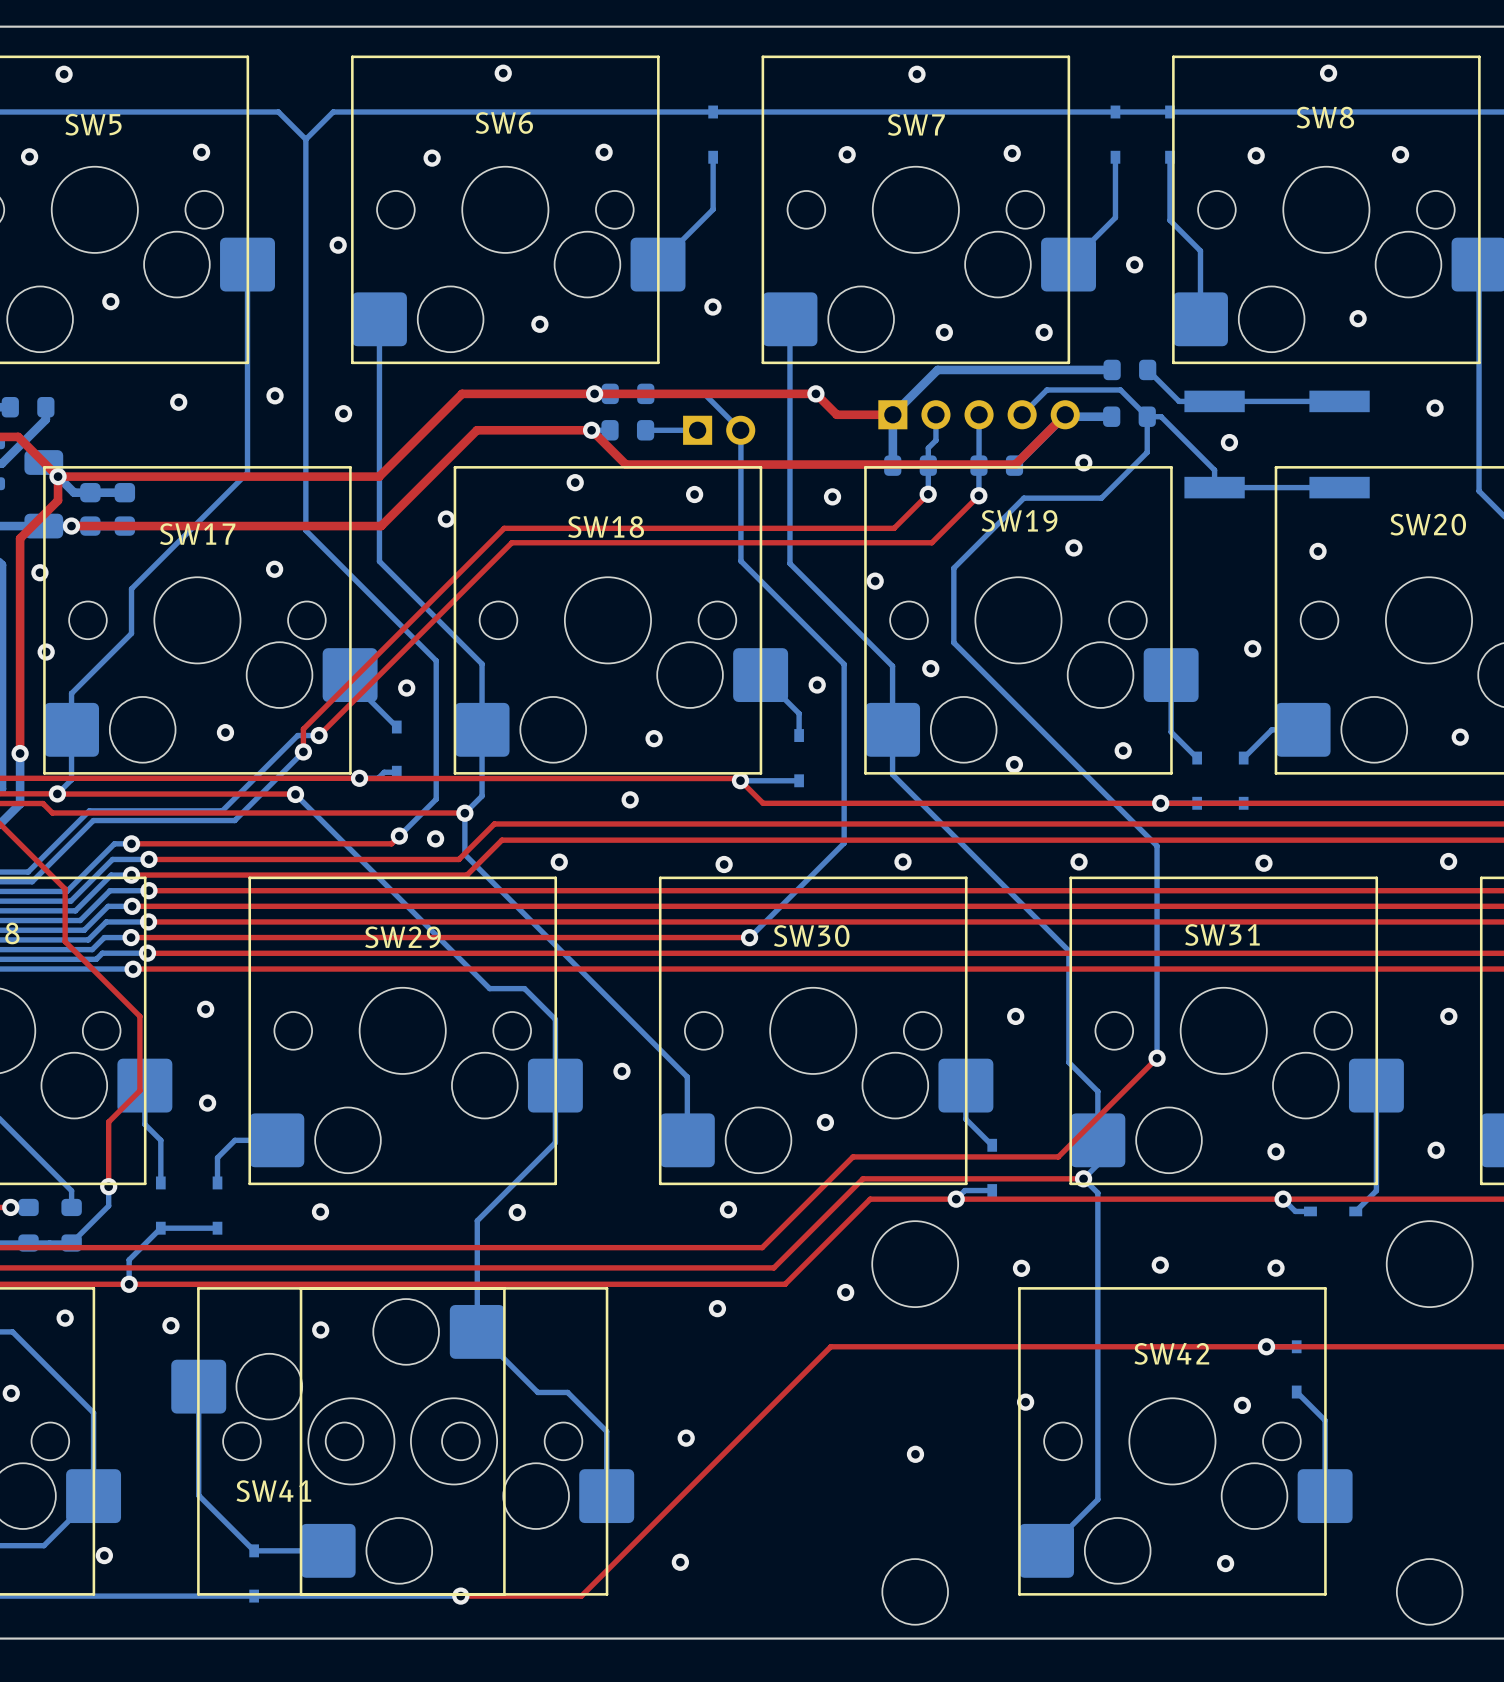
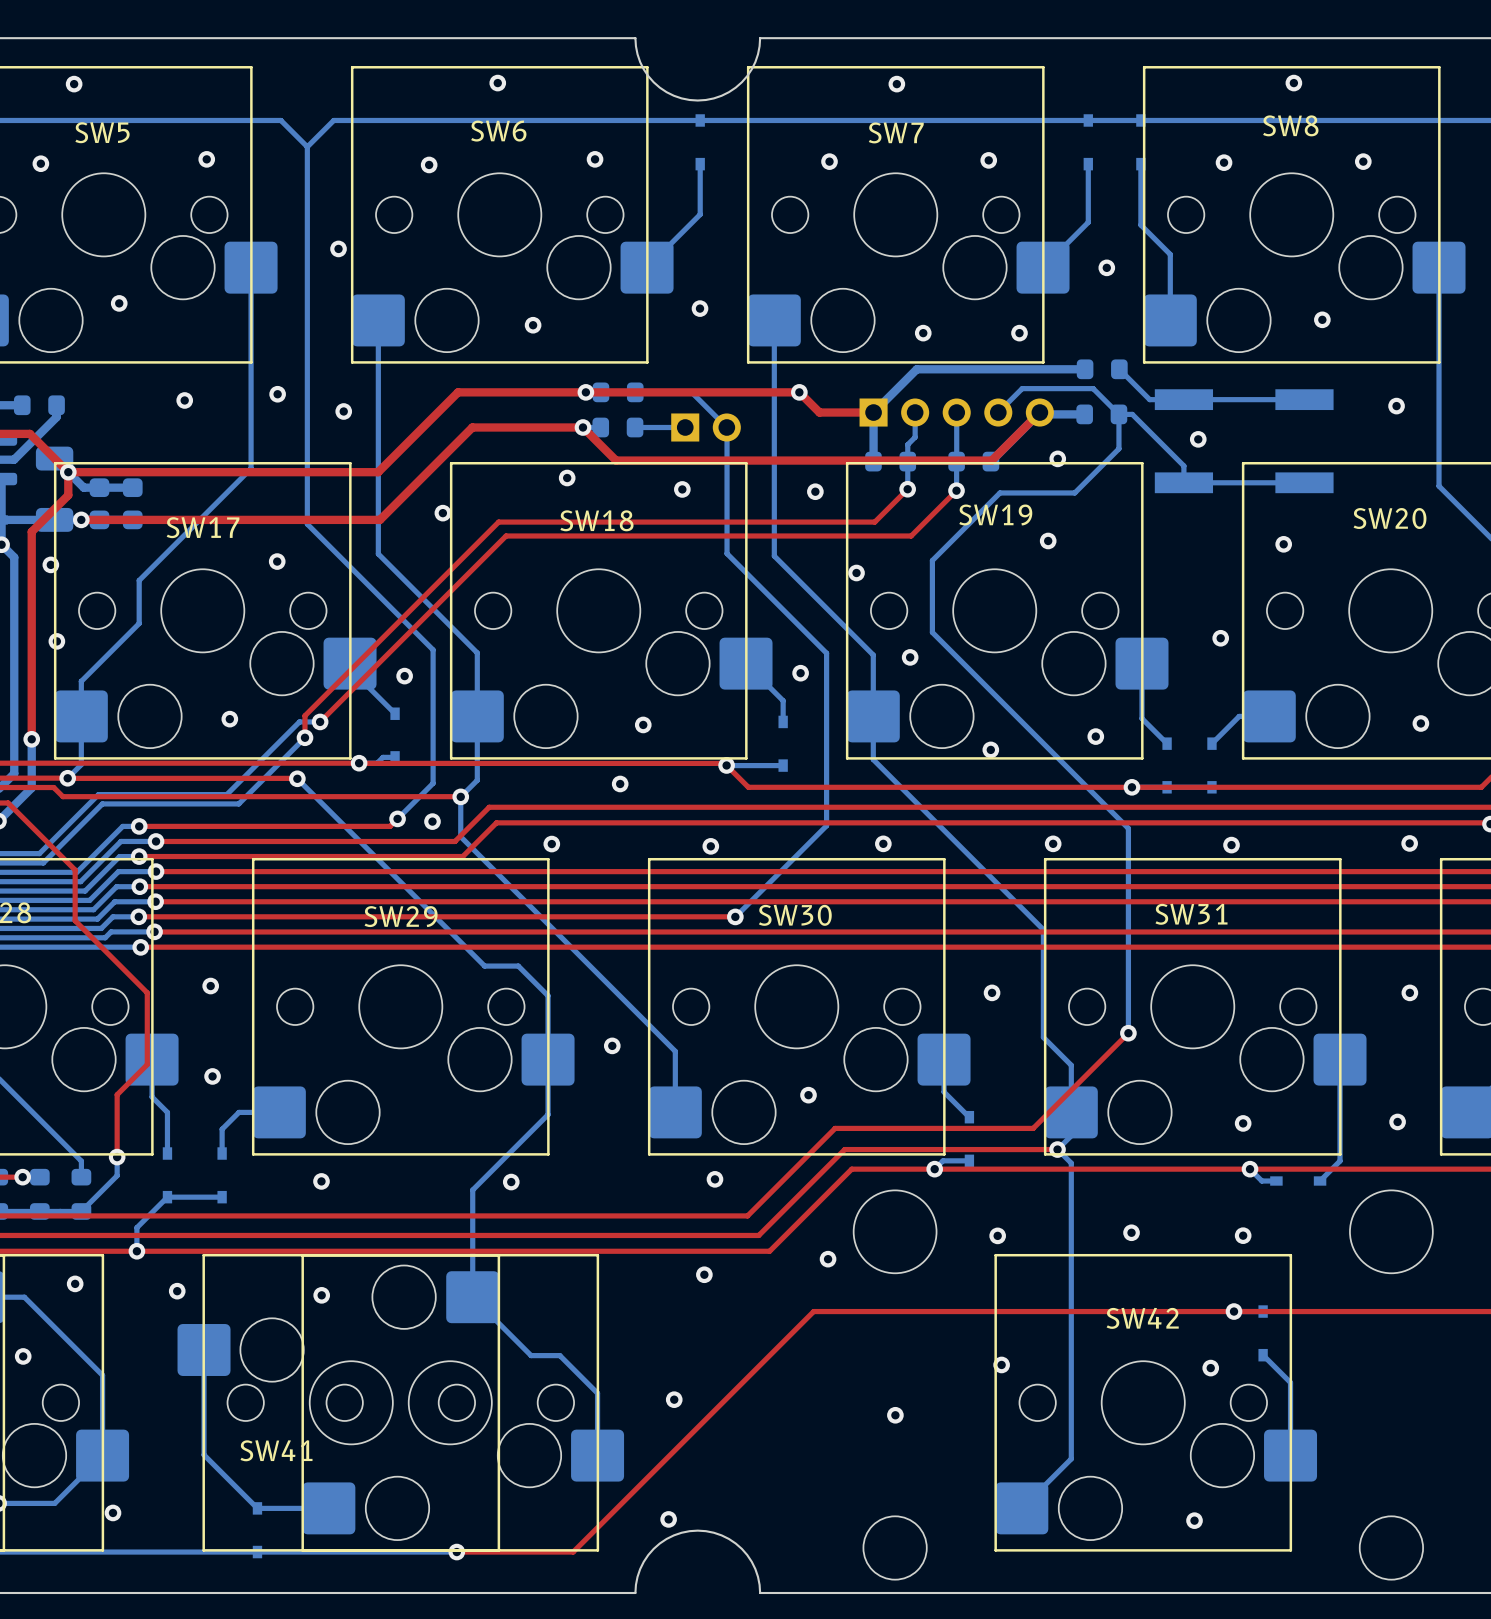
board edge: (645, 26) (775, 26) -> (635, 38) (640, 62) (653, 82) (673, 95) (697, 100) (721, 95) (741, 82) (755, 62) (760, 38)
board edge: (645, 1638) (775, 1638) -> (635, 1592) (640, 1569) (653, 1548) (673, 1535) (697, 1530) (721, 1535) (741, 1548) (755, 1569) (760, 1592)

